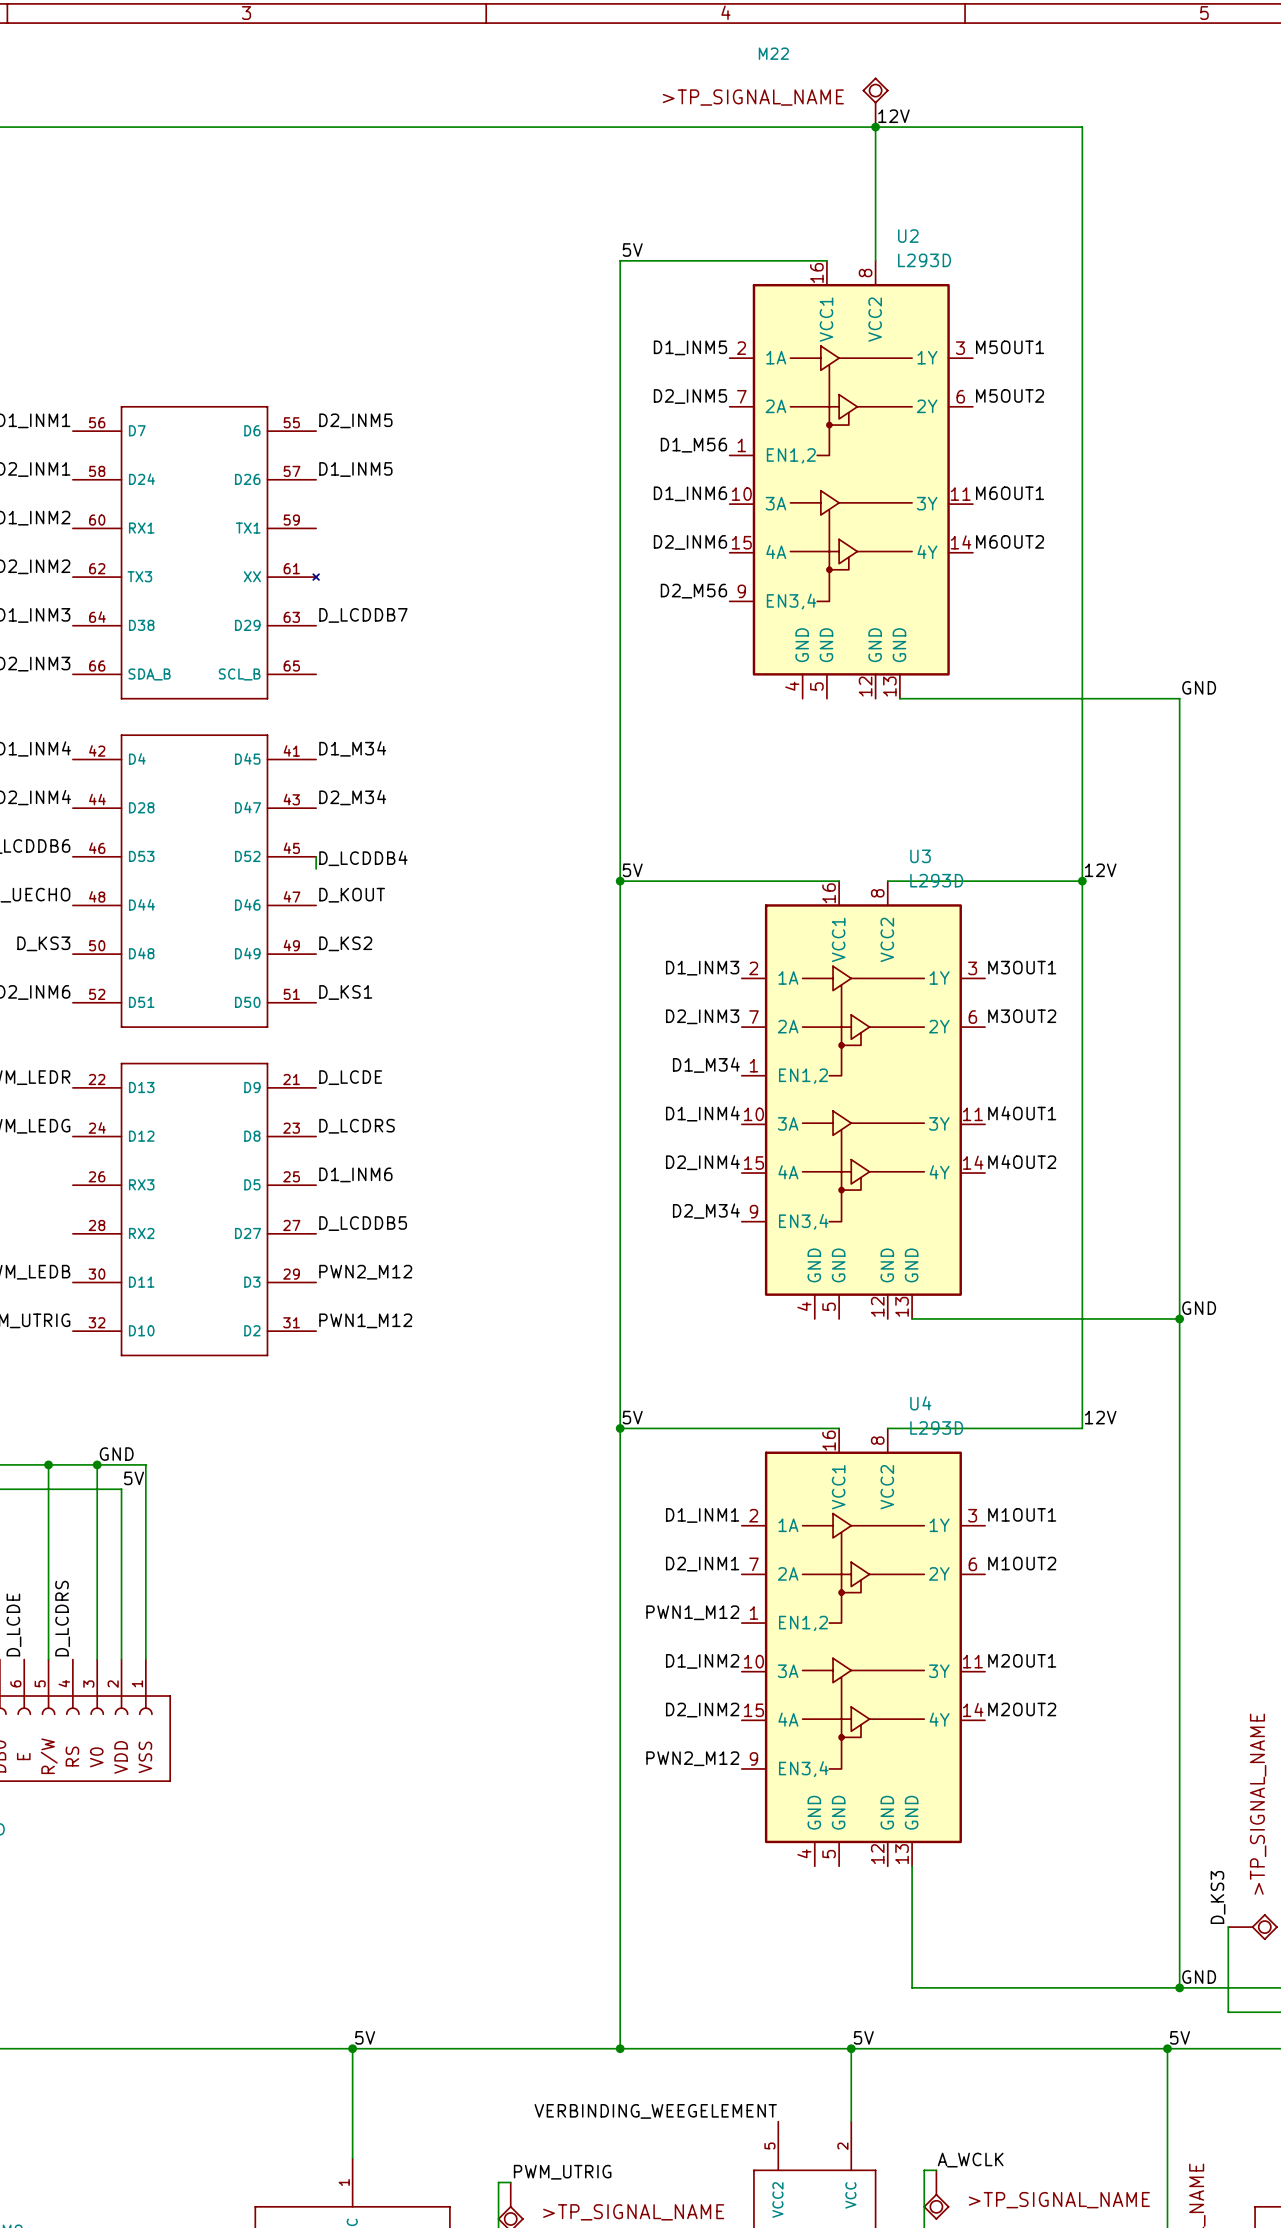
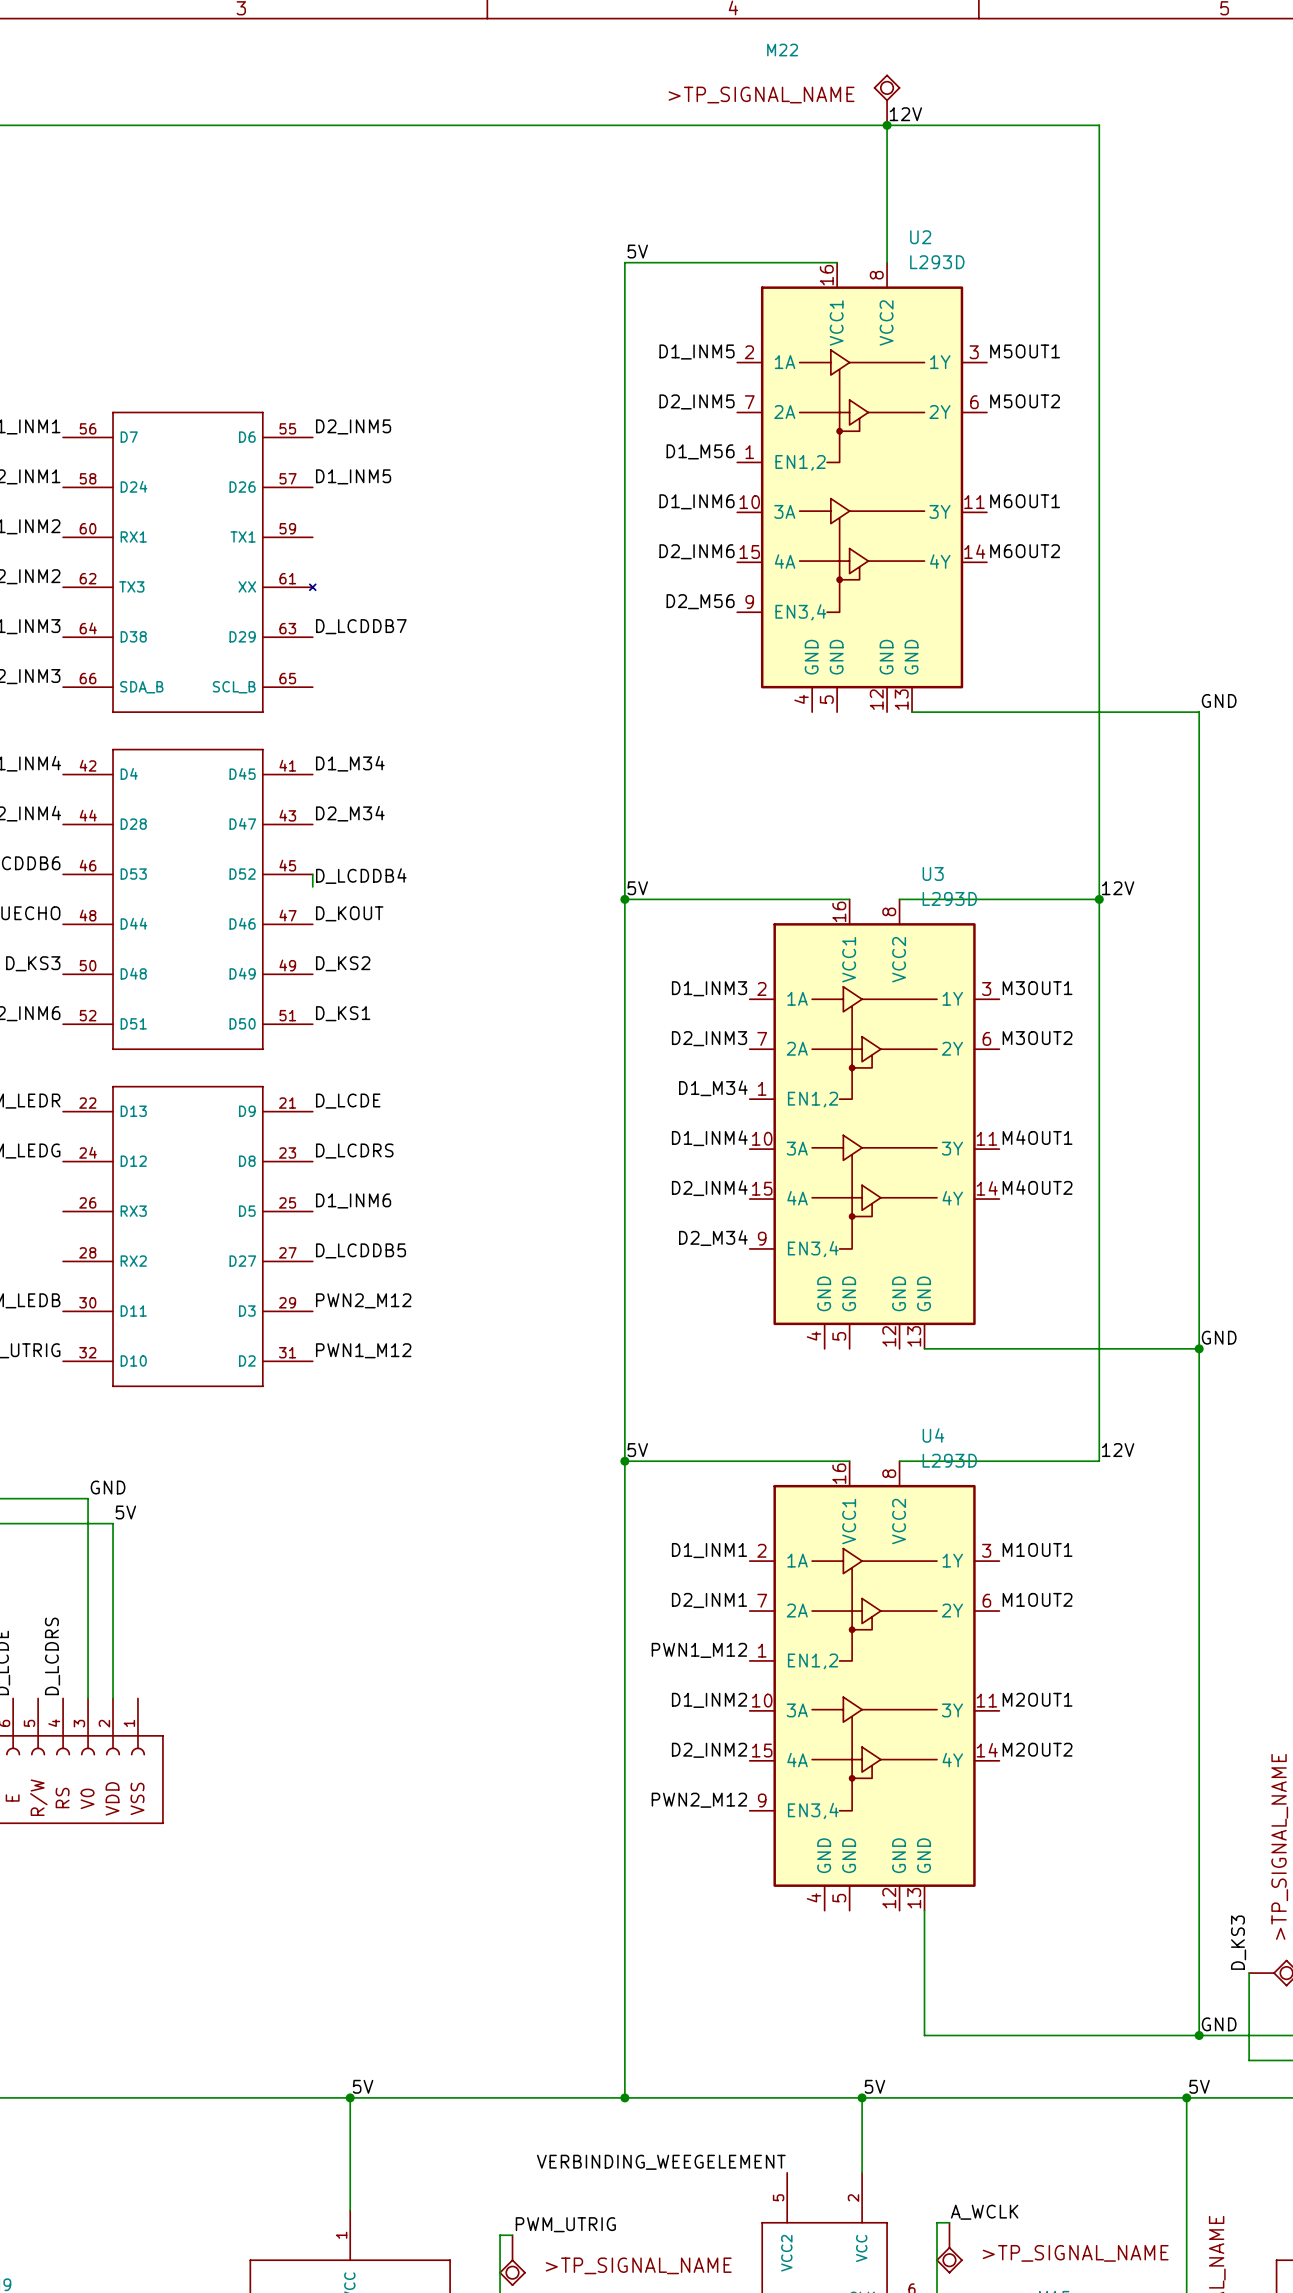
wire: (48, 1464) (48, 1659) -> none
junction: (48, 1464) -> none
wire: (97, 1464) (145, 1464) (145, 1659) -> none
junction: (97, 1464) -> none

